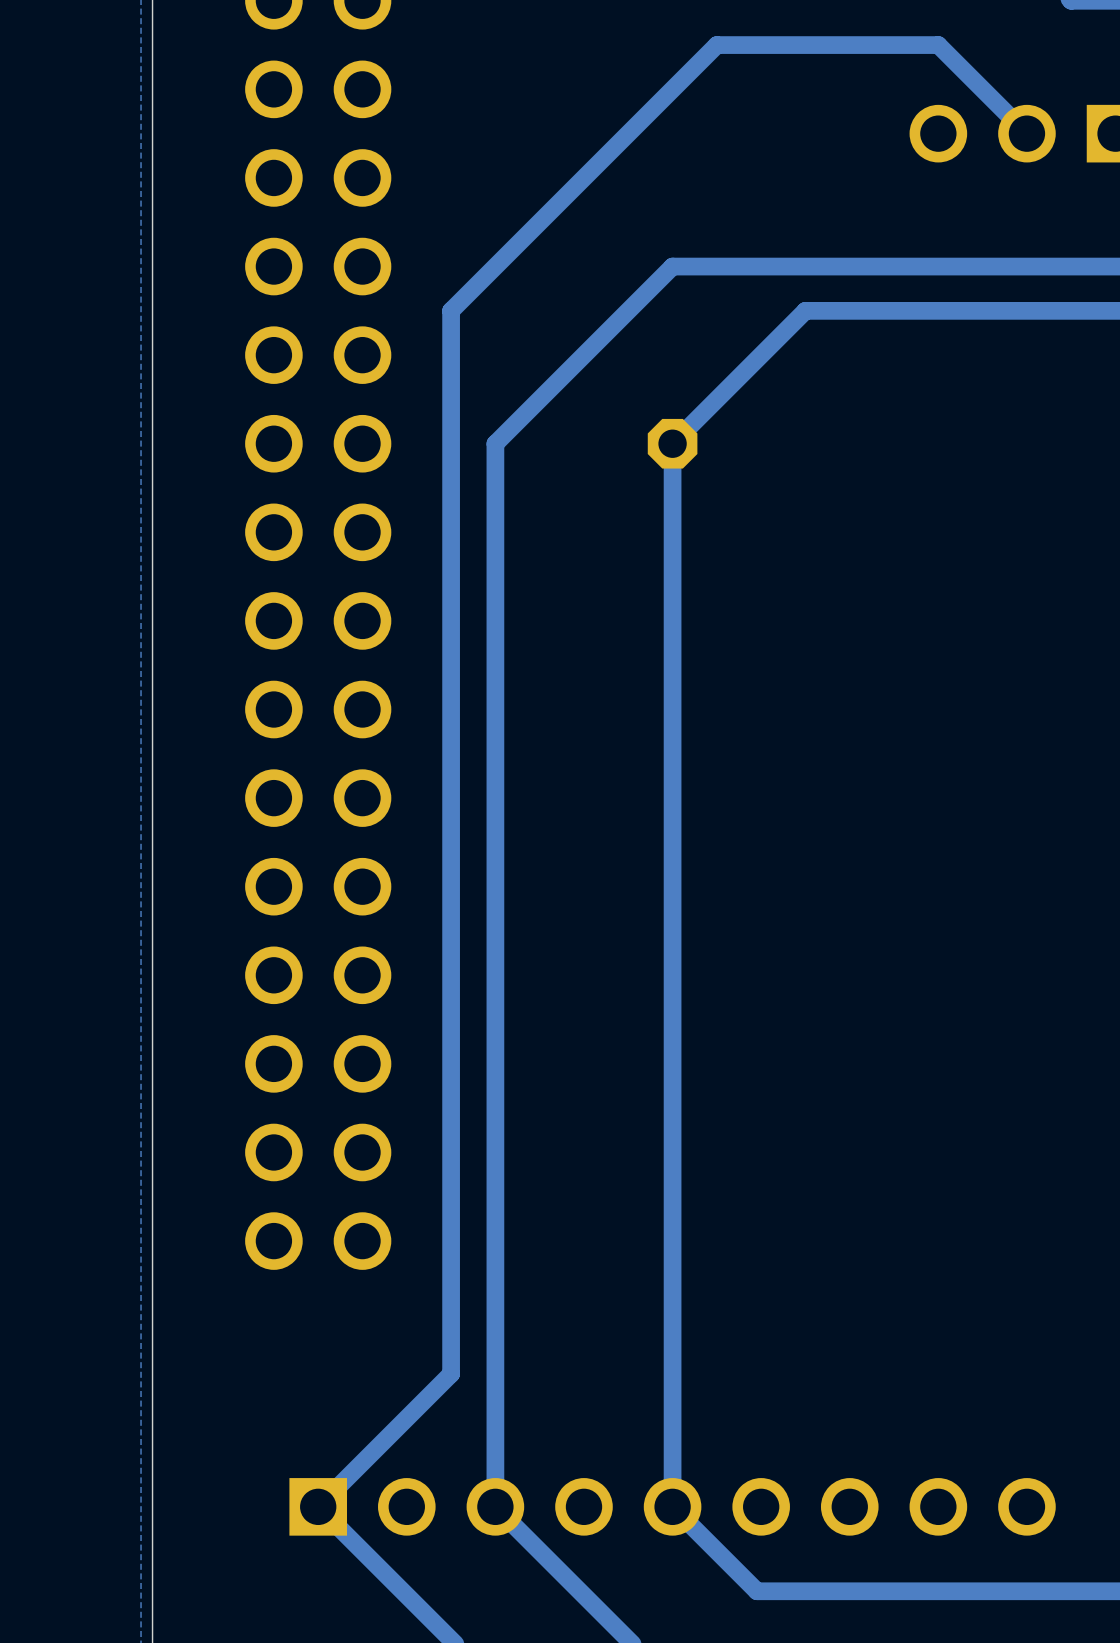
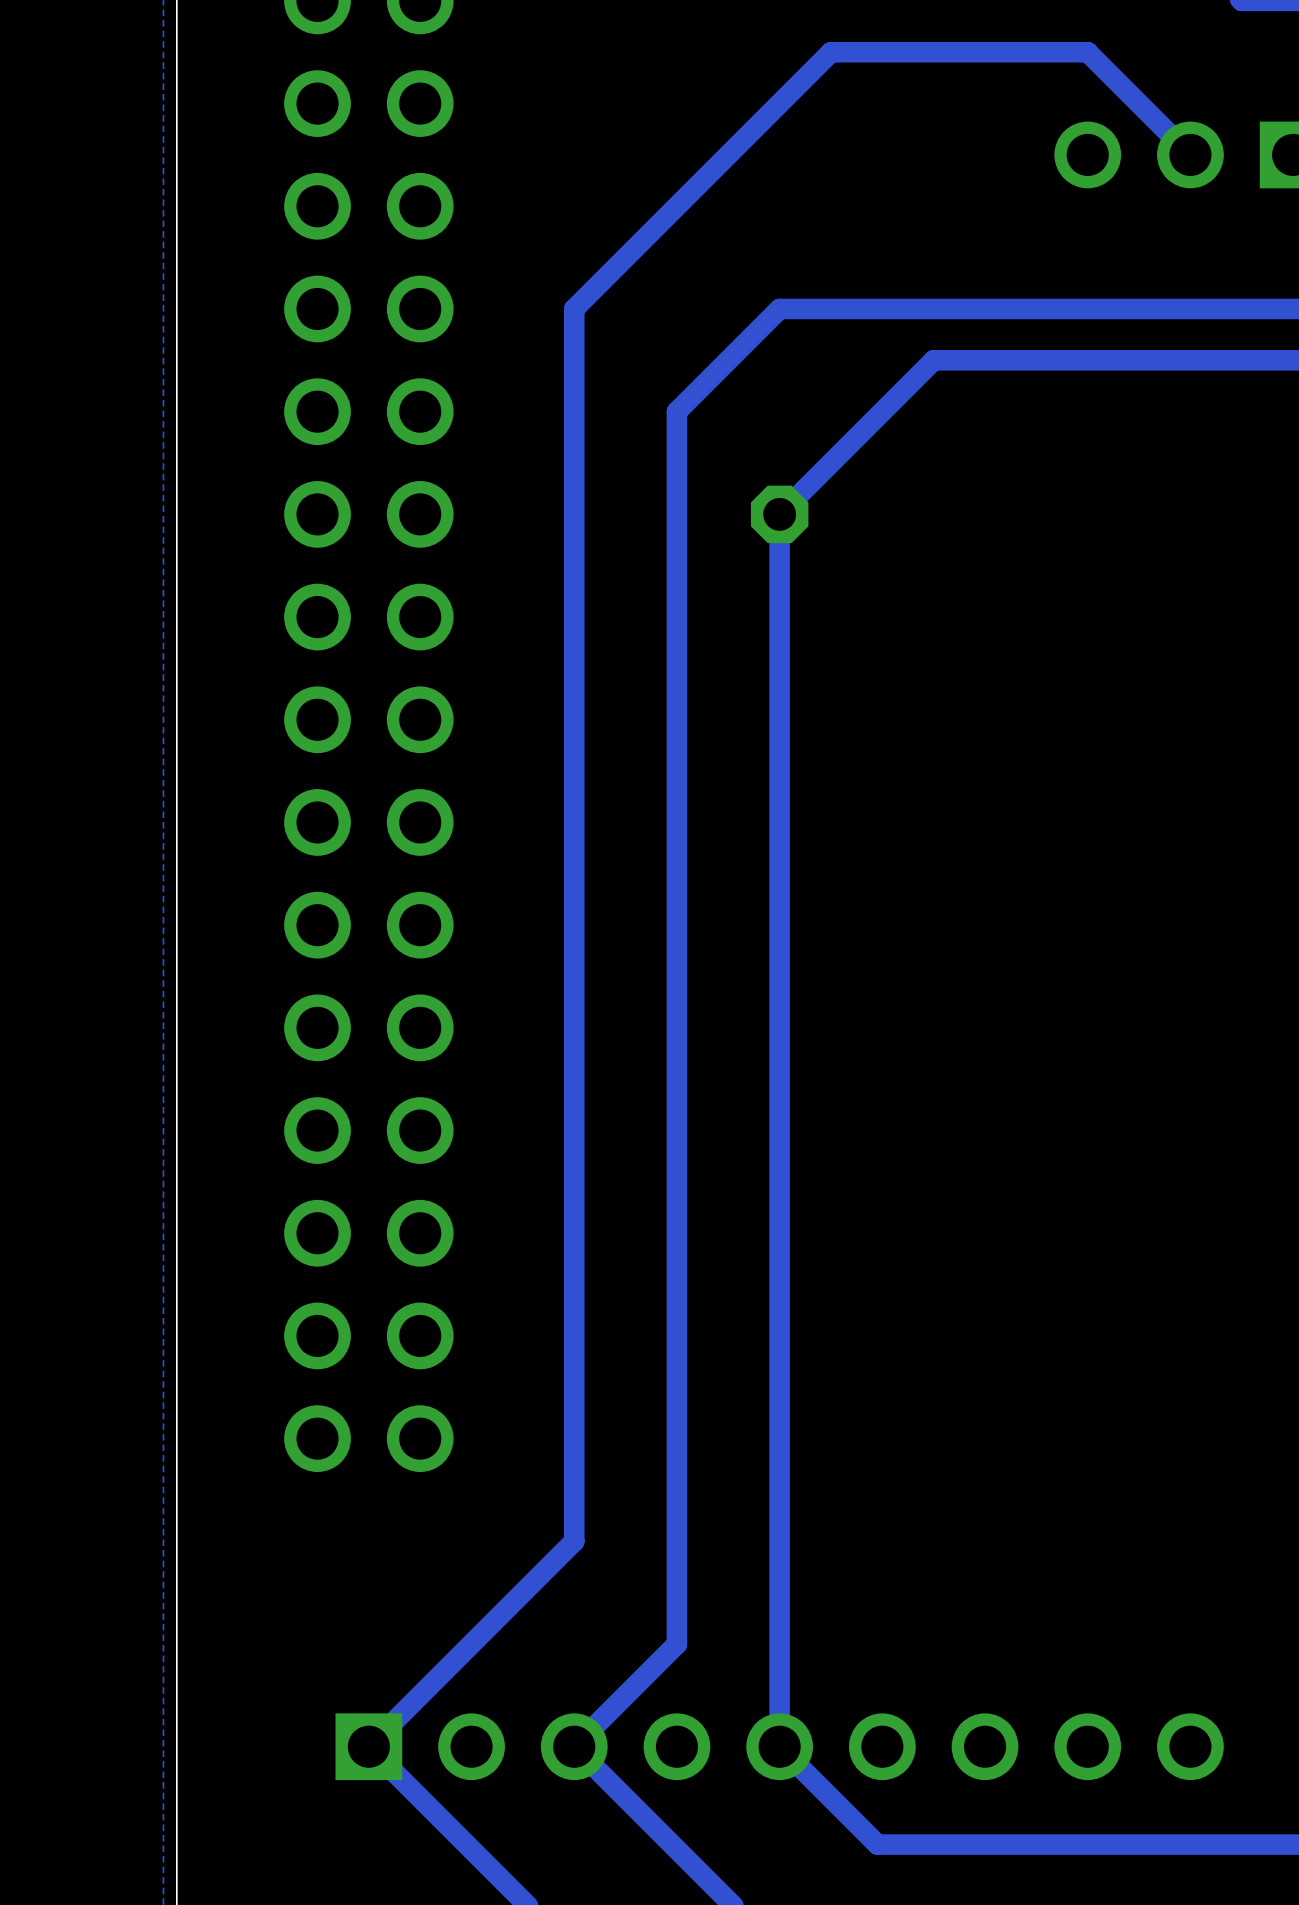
track: (495, 266) (451, 310) (451, 1373) -> none
track: (583, 355) (495, 443) -> (574, 308) (574, 514)
track: none -> (676, 411) (676, 1644) (574, 1746)
track: (495, 1329) (495, 1506) -> (574, 1541) (522, 1592)

